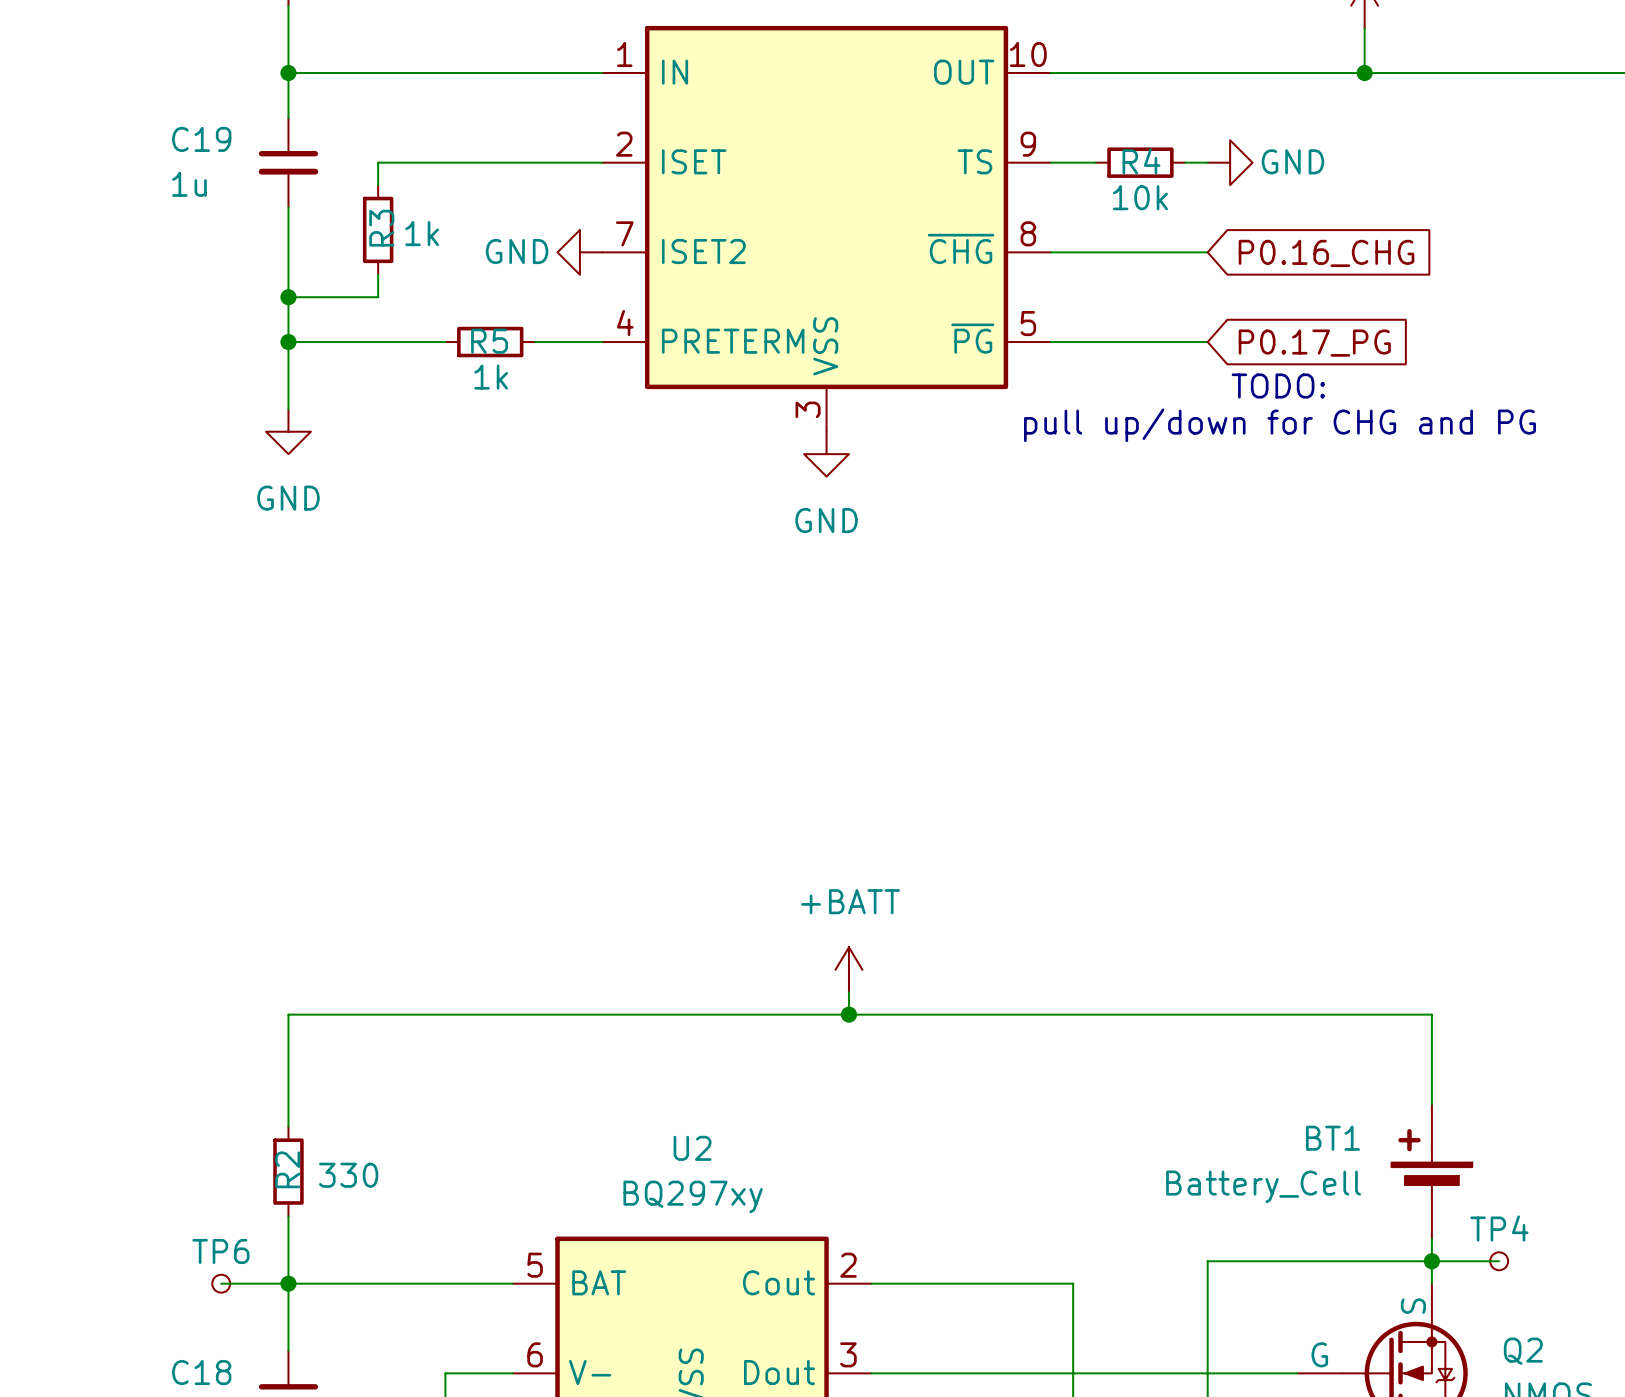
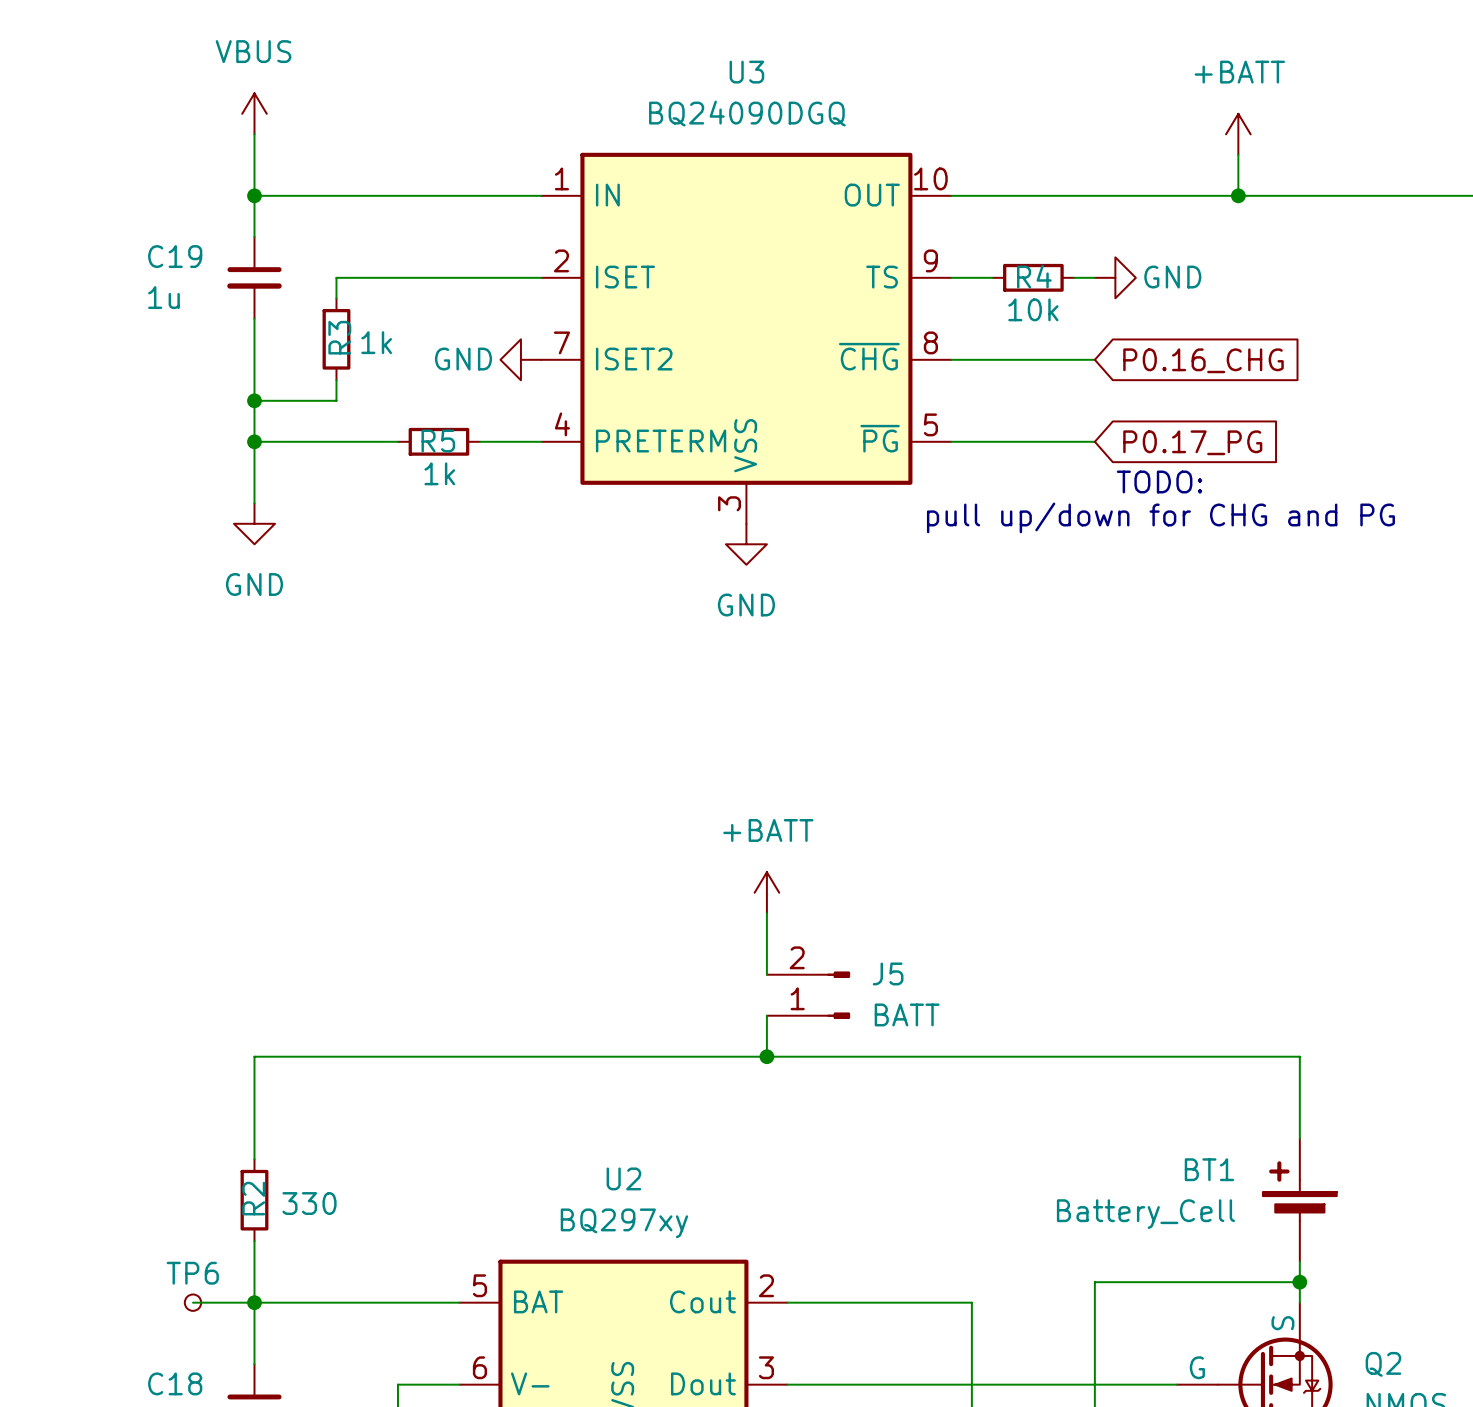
wire: none -> (766, 913) (766, 974)
J5: none -> BATT (808, 995)
power symbol position: +BATT (848, 969) -> +BATT (766, 892)
wire: (1431, 1261) (1499, 1261) -> none
TP4: (1499, 1261) -> none

